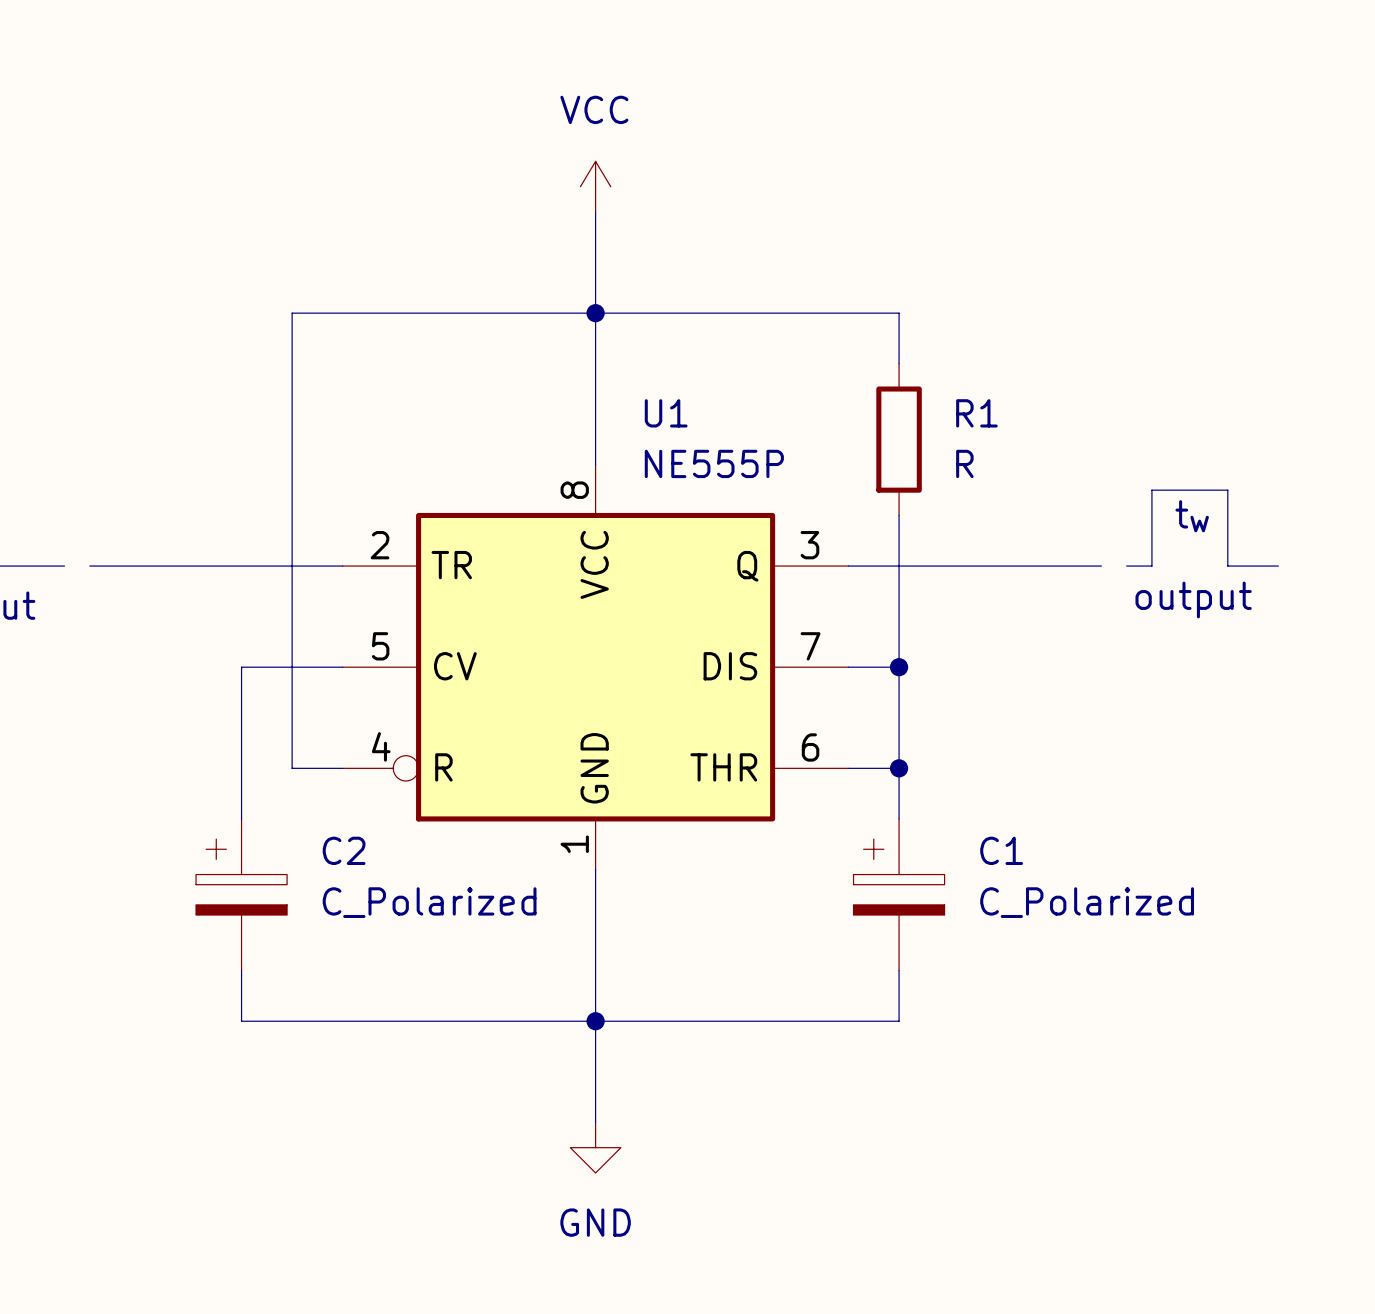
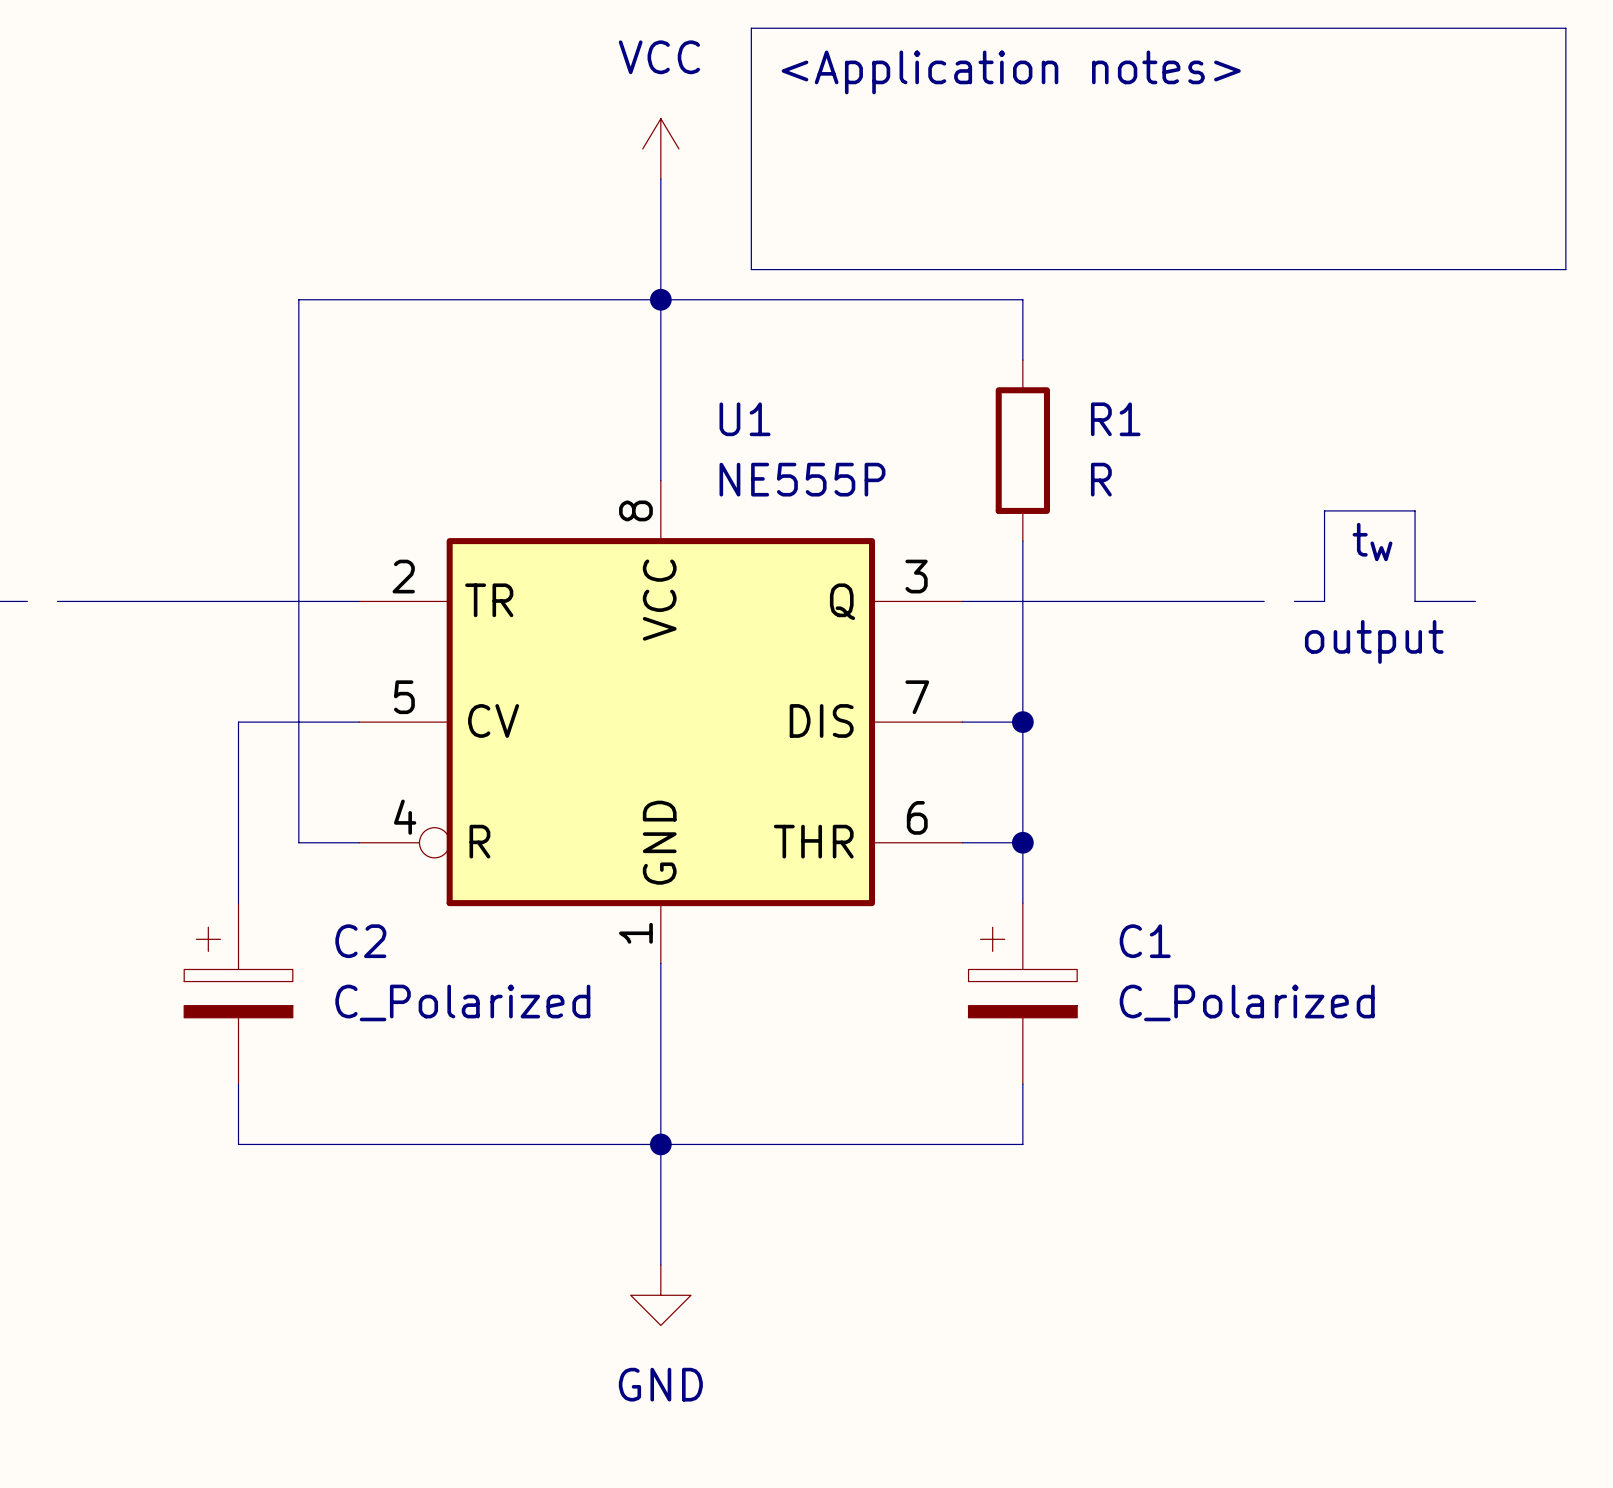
line: none -> (751, 28) (1565, 28) (1565, 269) (751, 269) (751, 28)
text: none -> <Application notes> (1011, 72)

